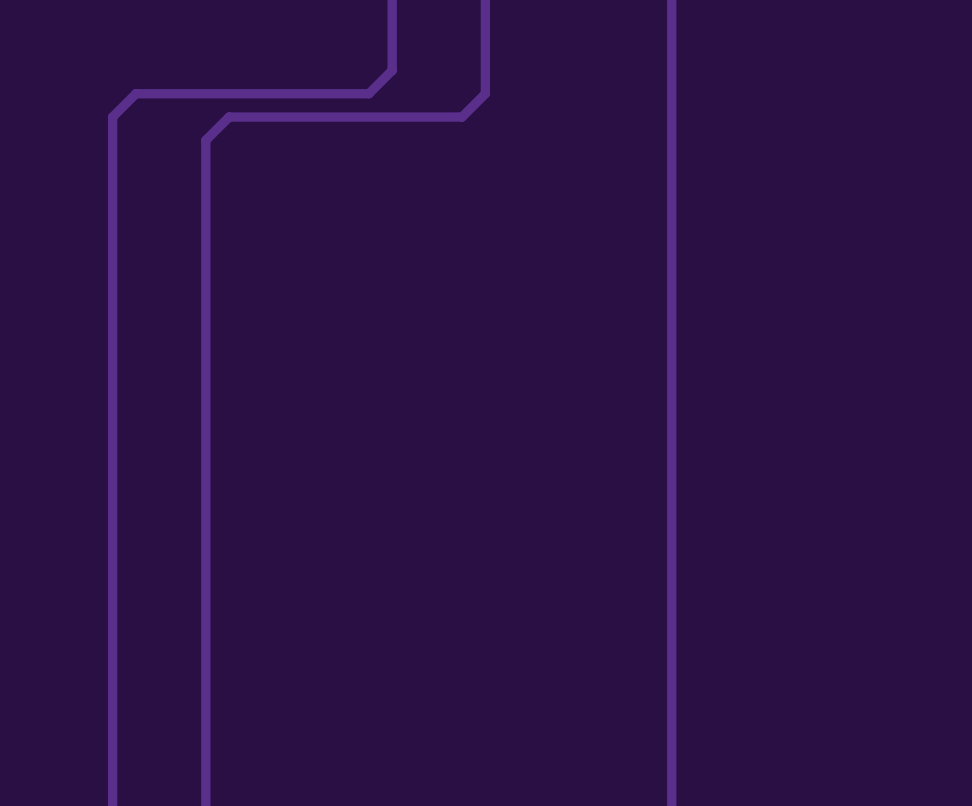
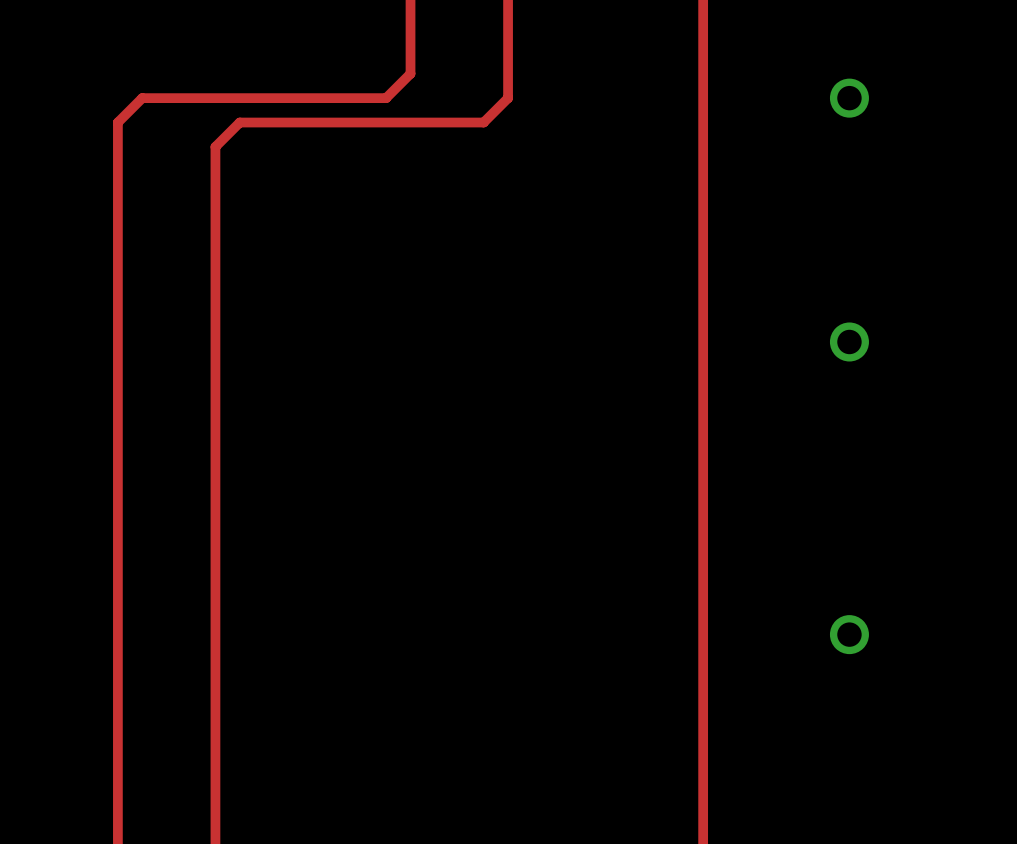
via: none -> (849, 98)
via: none -> (849, 341)
via: none -> (849, 634)

